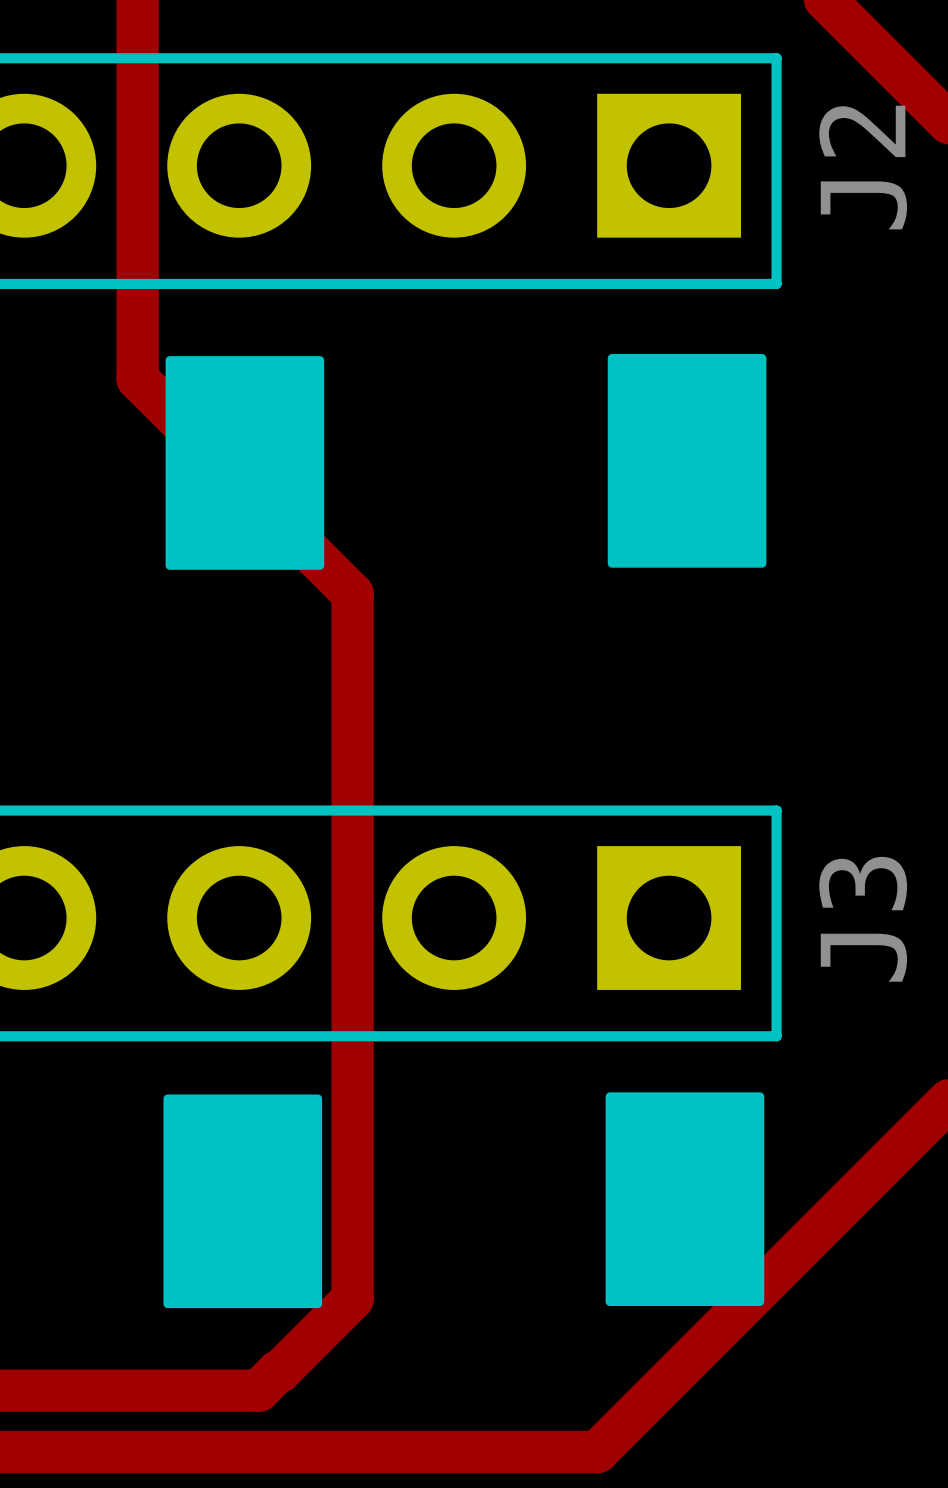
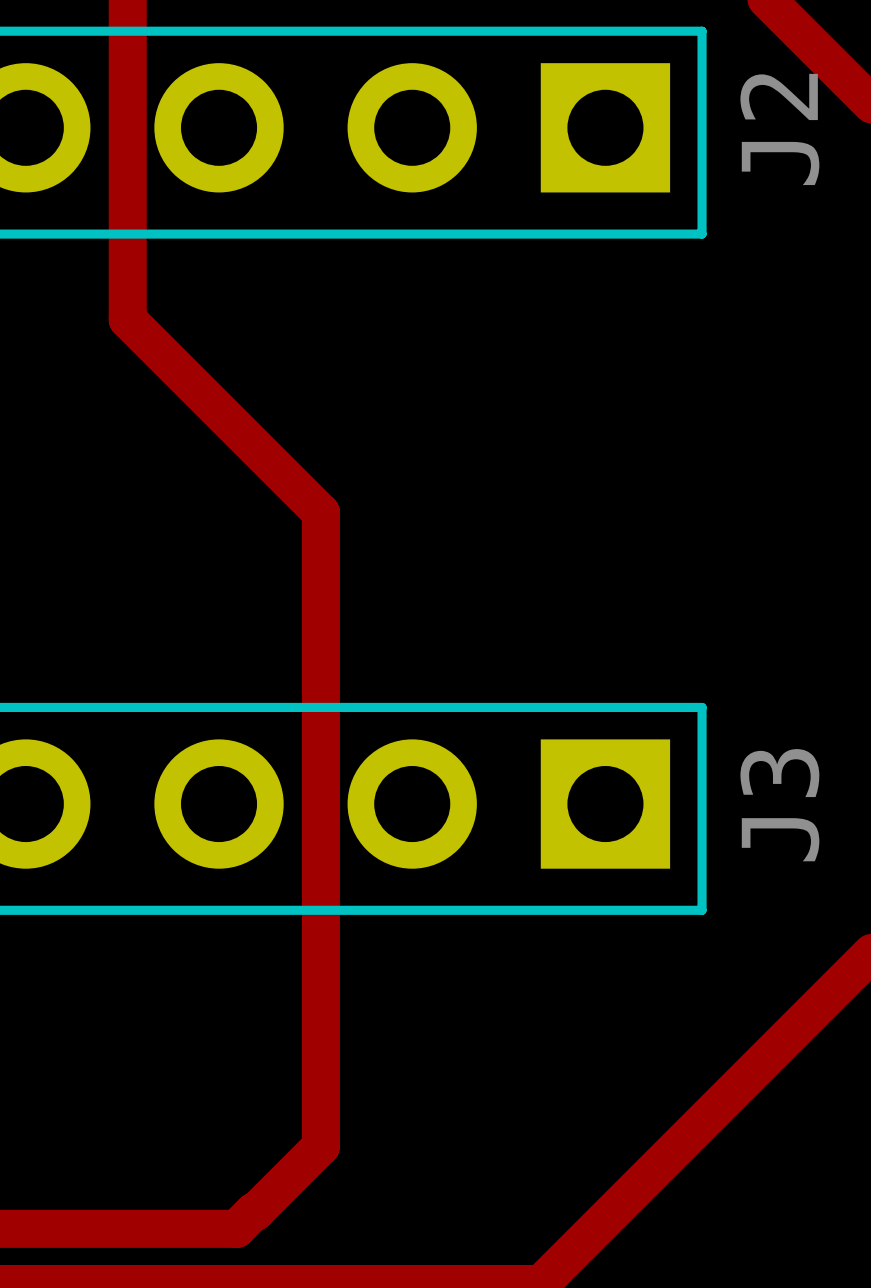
drawing: [607, 354, 767, 568] -> none
drawing: [165, 356, 325, 570] -> none
drawing: [605, 1092, 765, 1307] -> none
drawing: [163, 1094, 323, 1309] -> none

